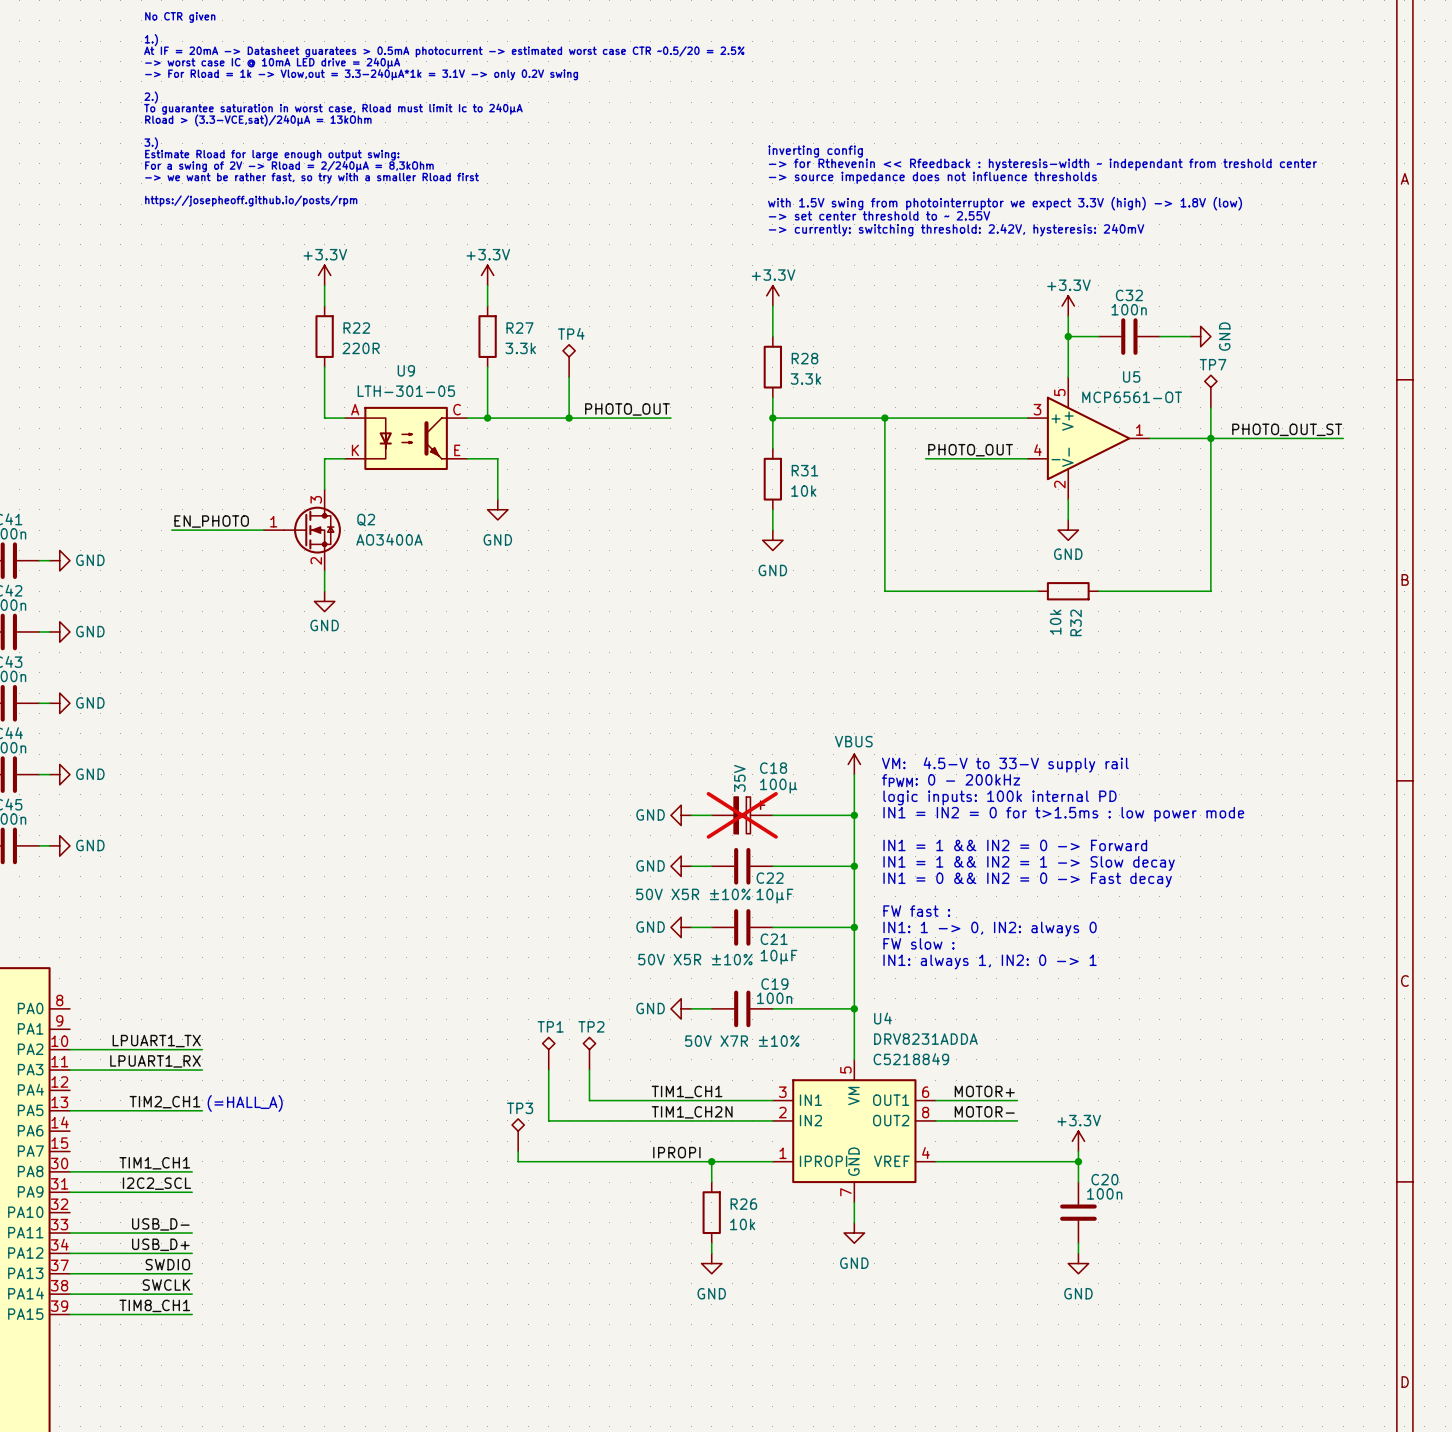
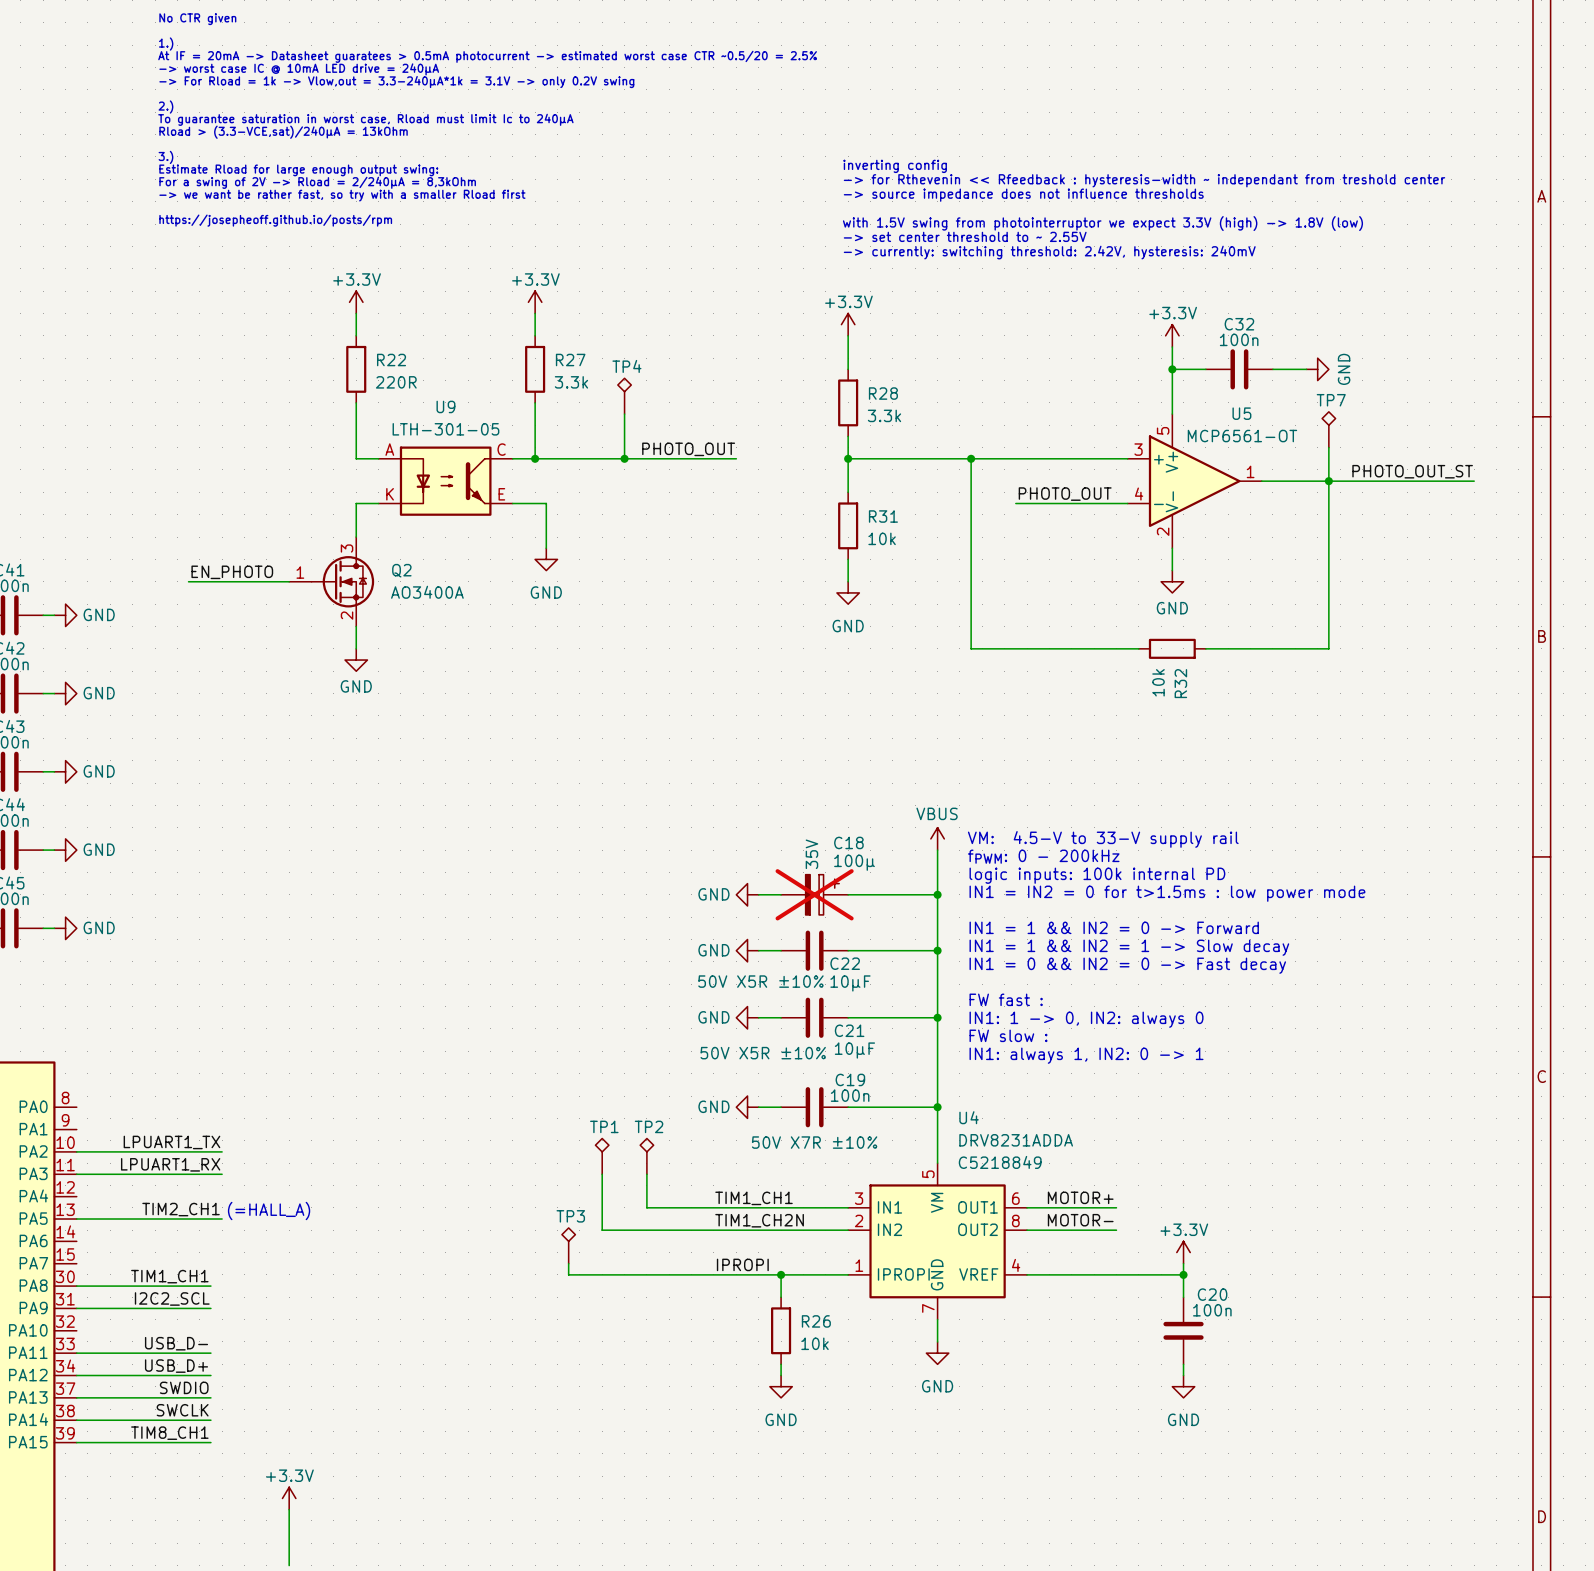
power symbol: none -> +3.3V (289, 1498)
wire: none -> (289, 1509) (289, 1565)

